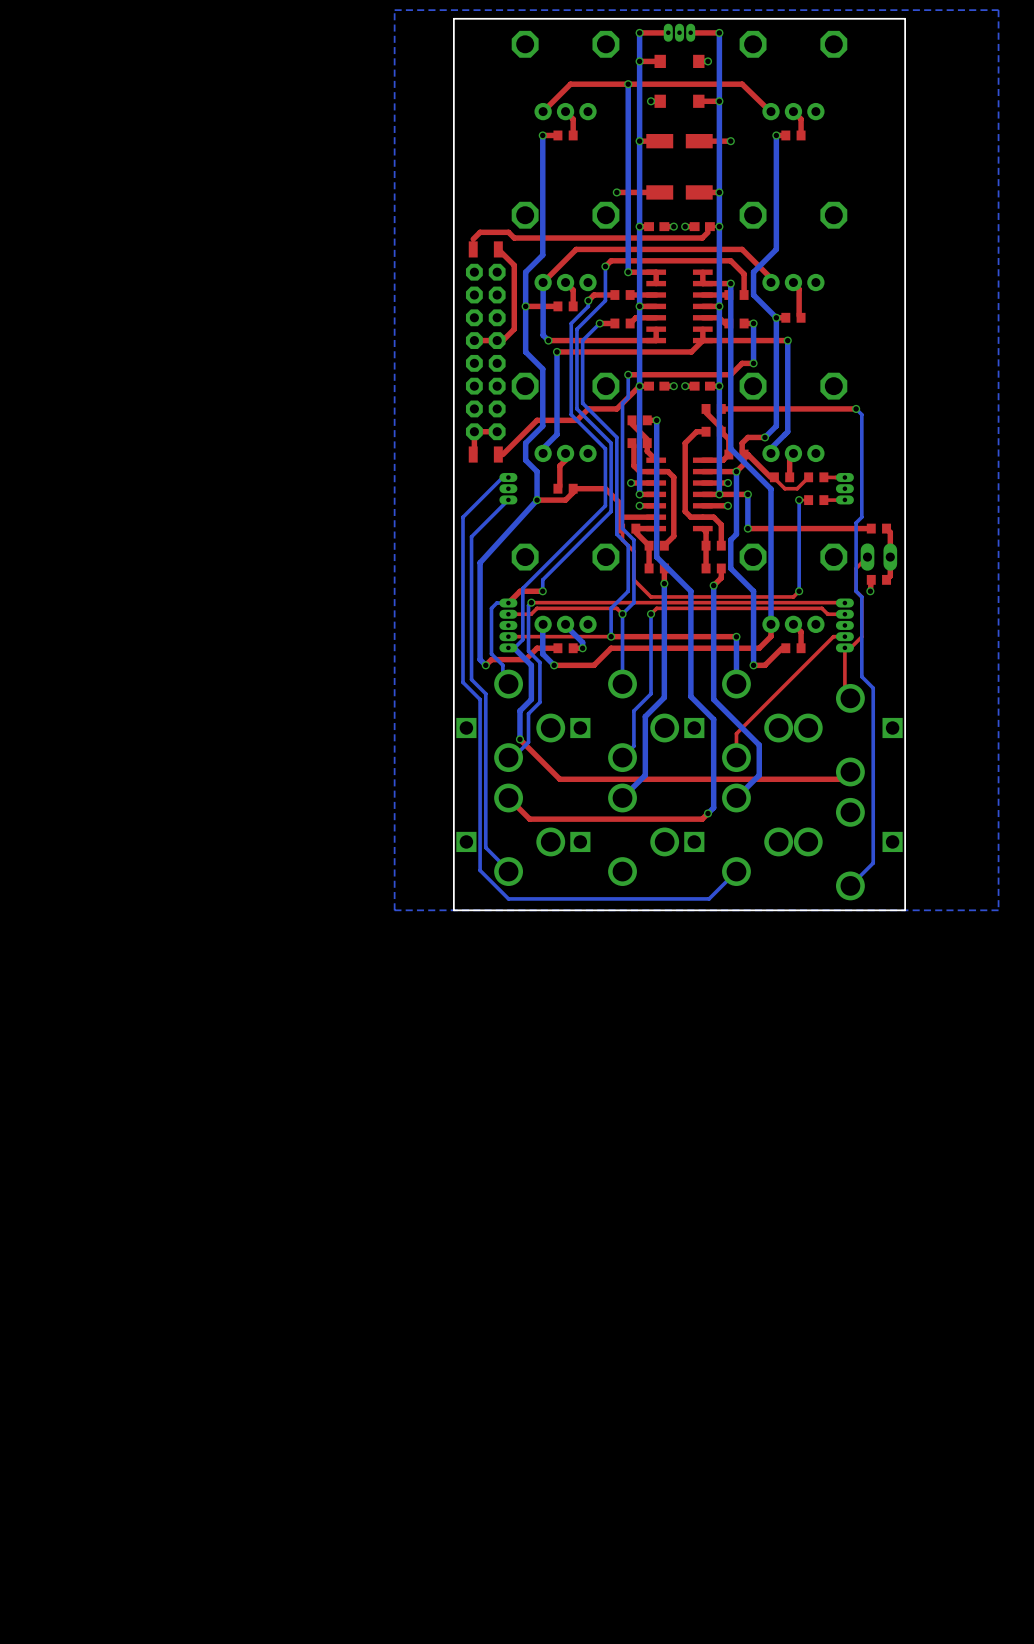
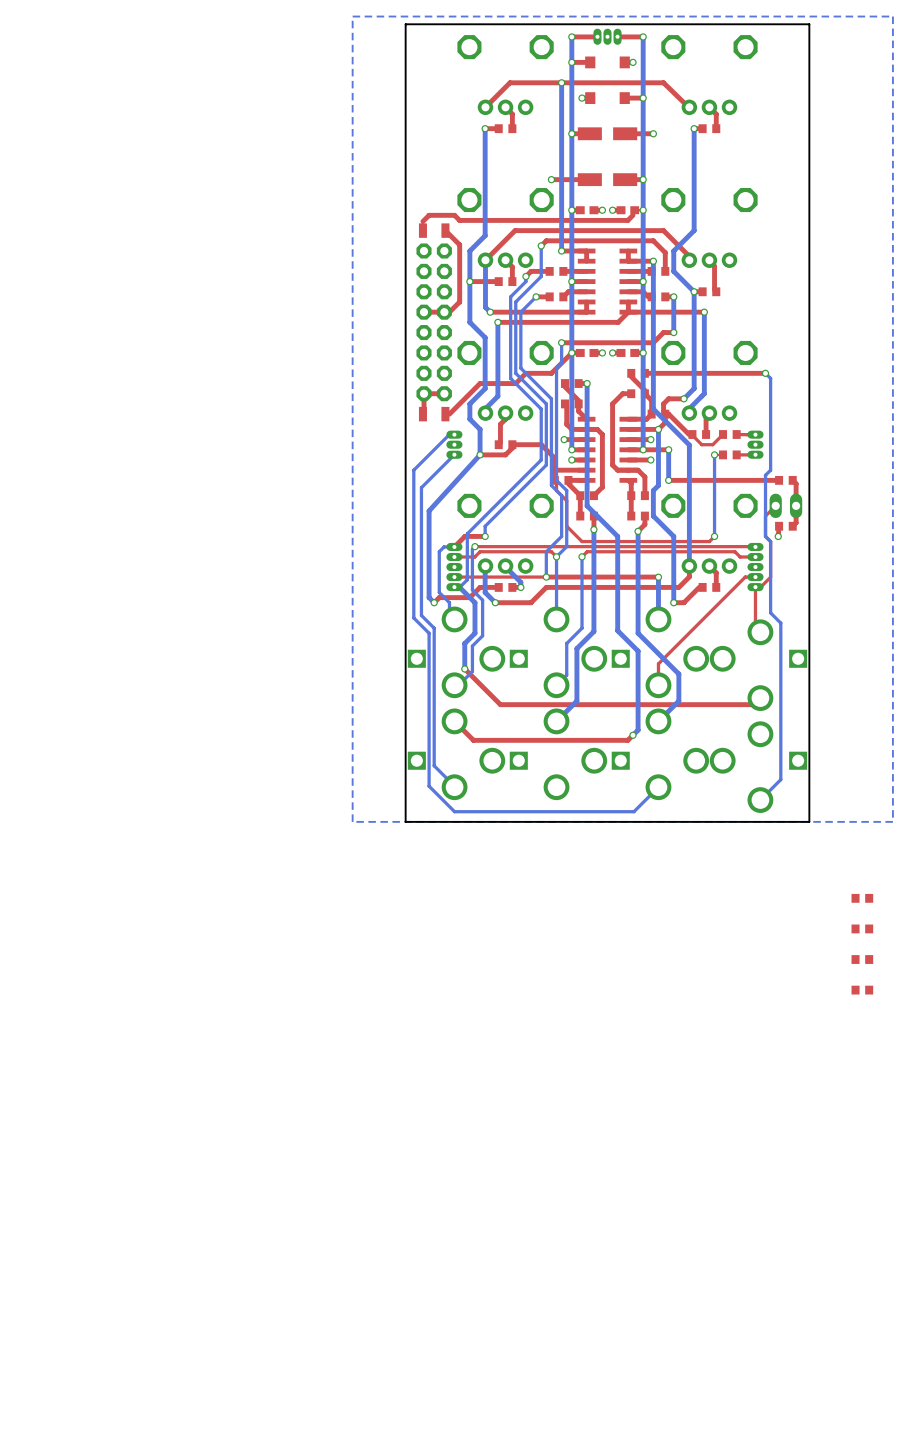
part: none -> (862, 898)
part: none -> (862, 928)
part: none -> (862, 959)
part: none -> (862, 990)

